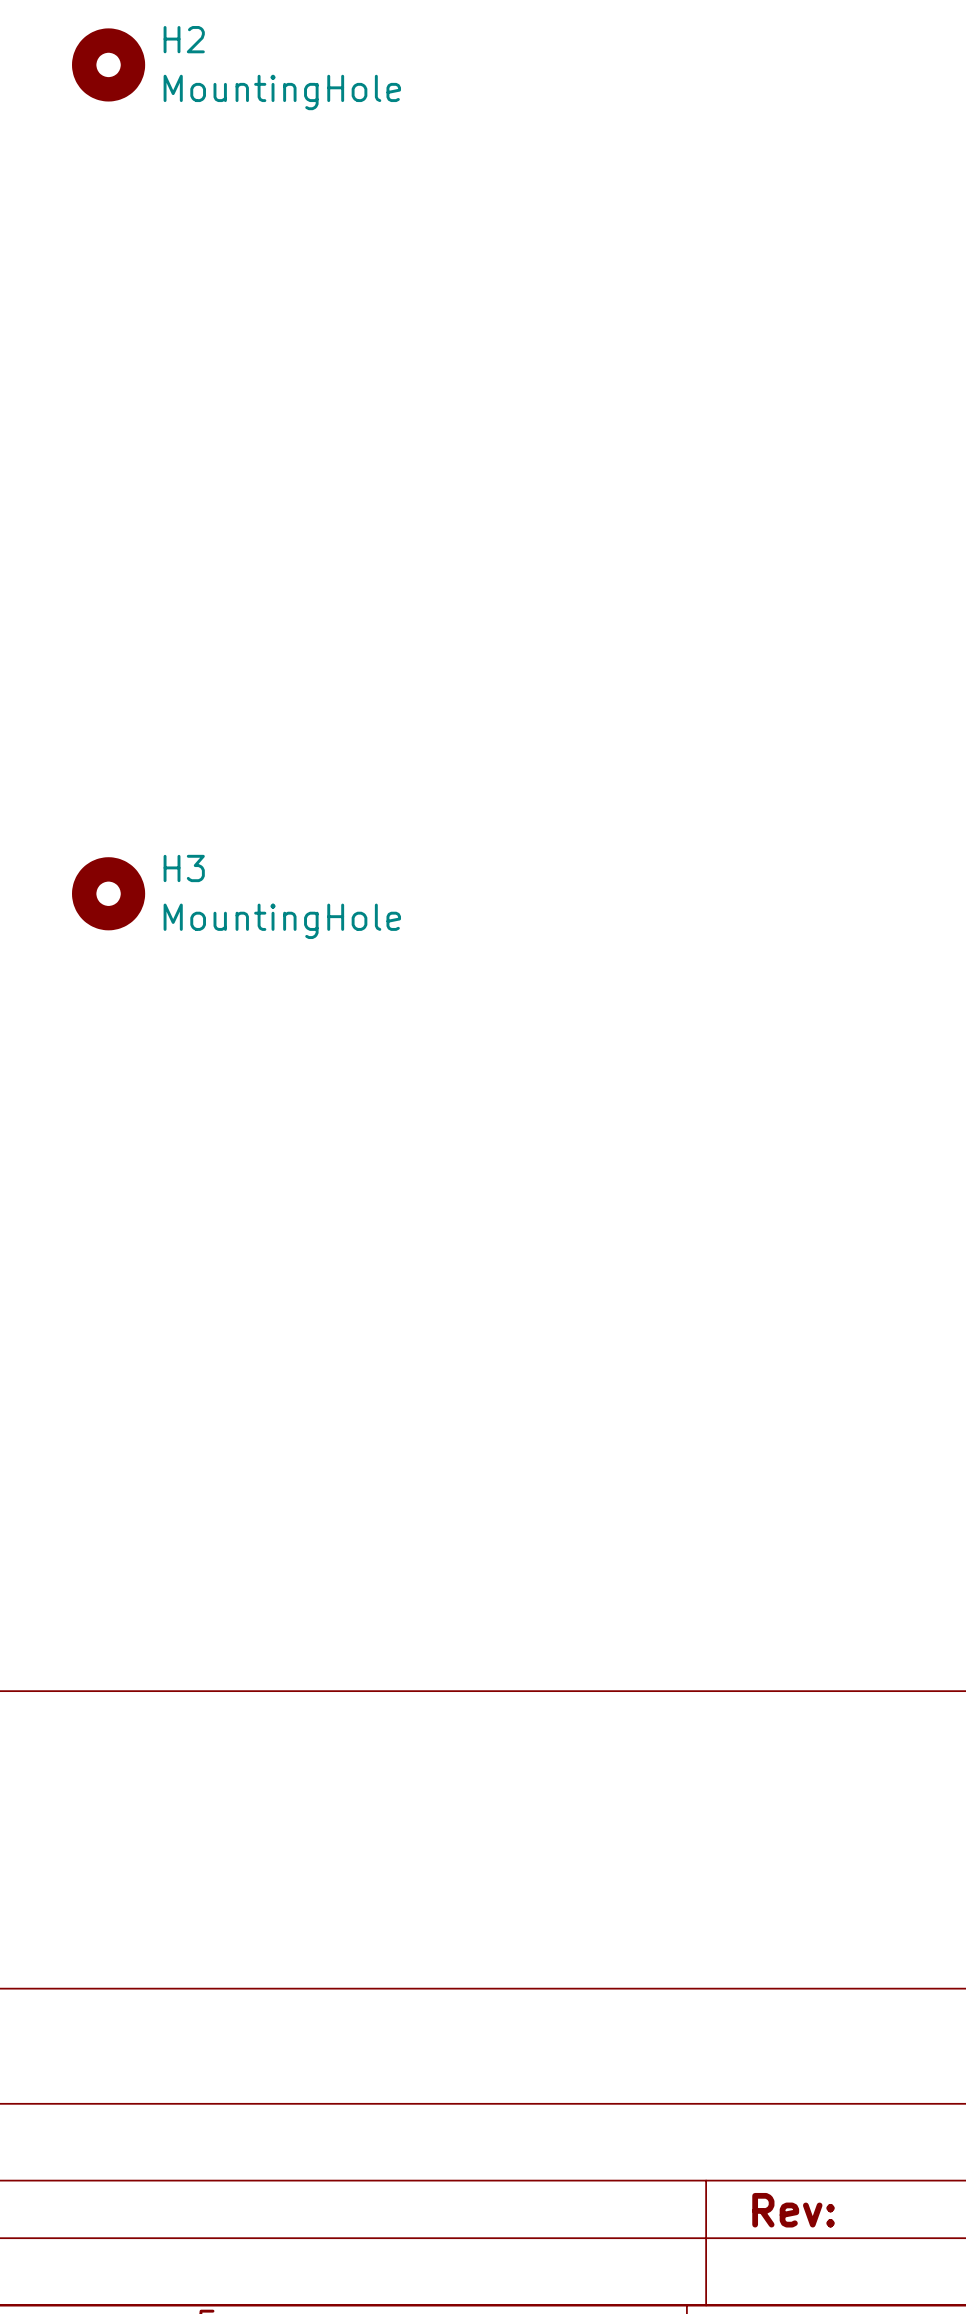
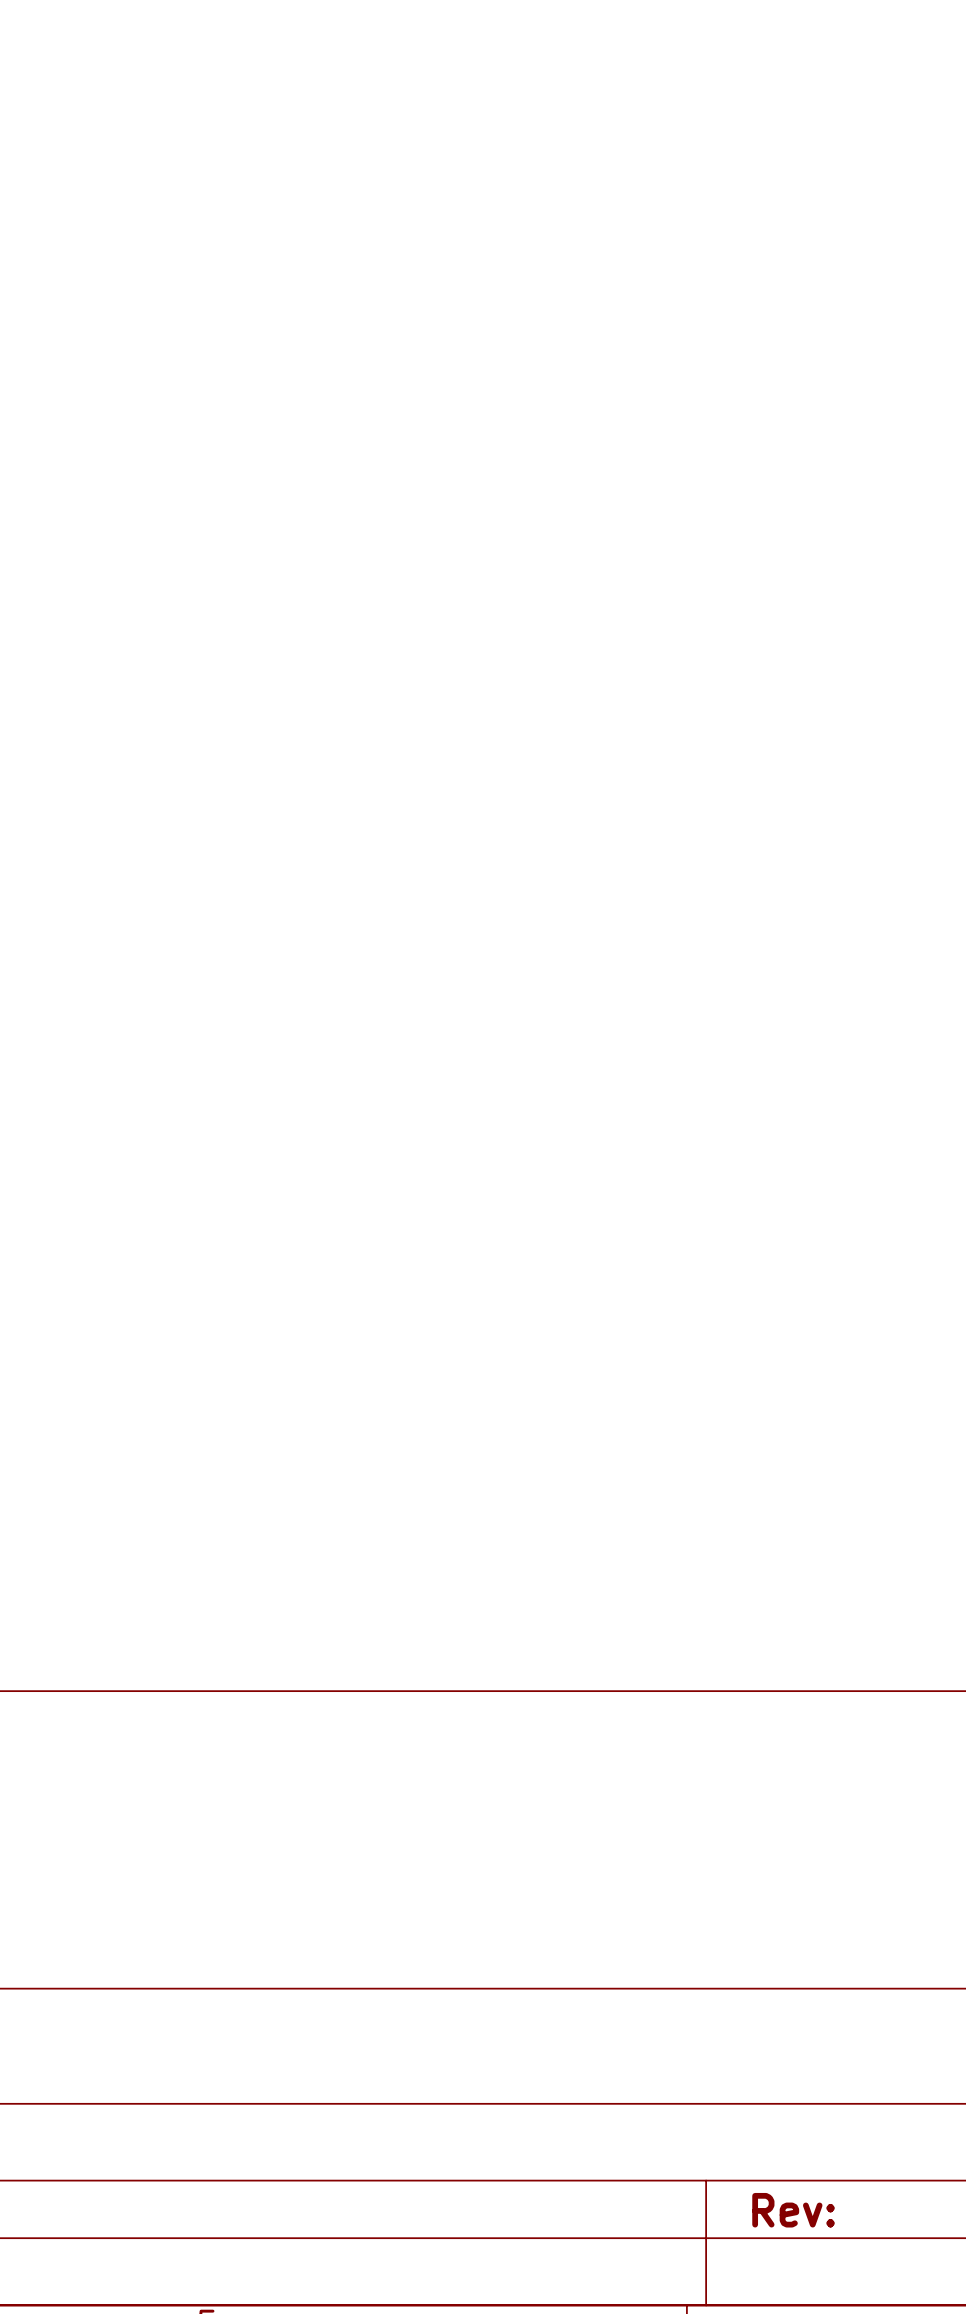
H2: MountingHole (108, 64) -> none
H3: MountingHole (108, 893) -> none

